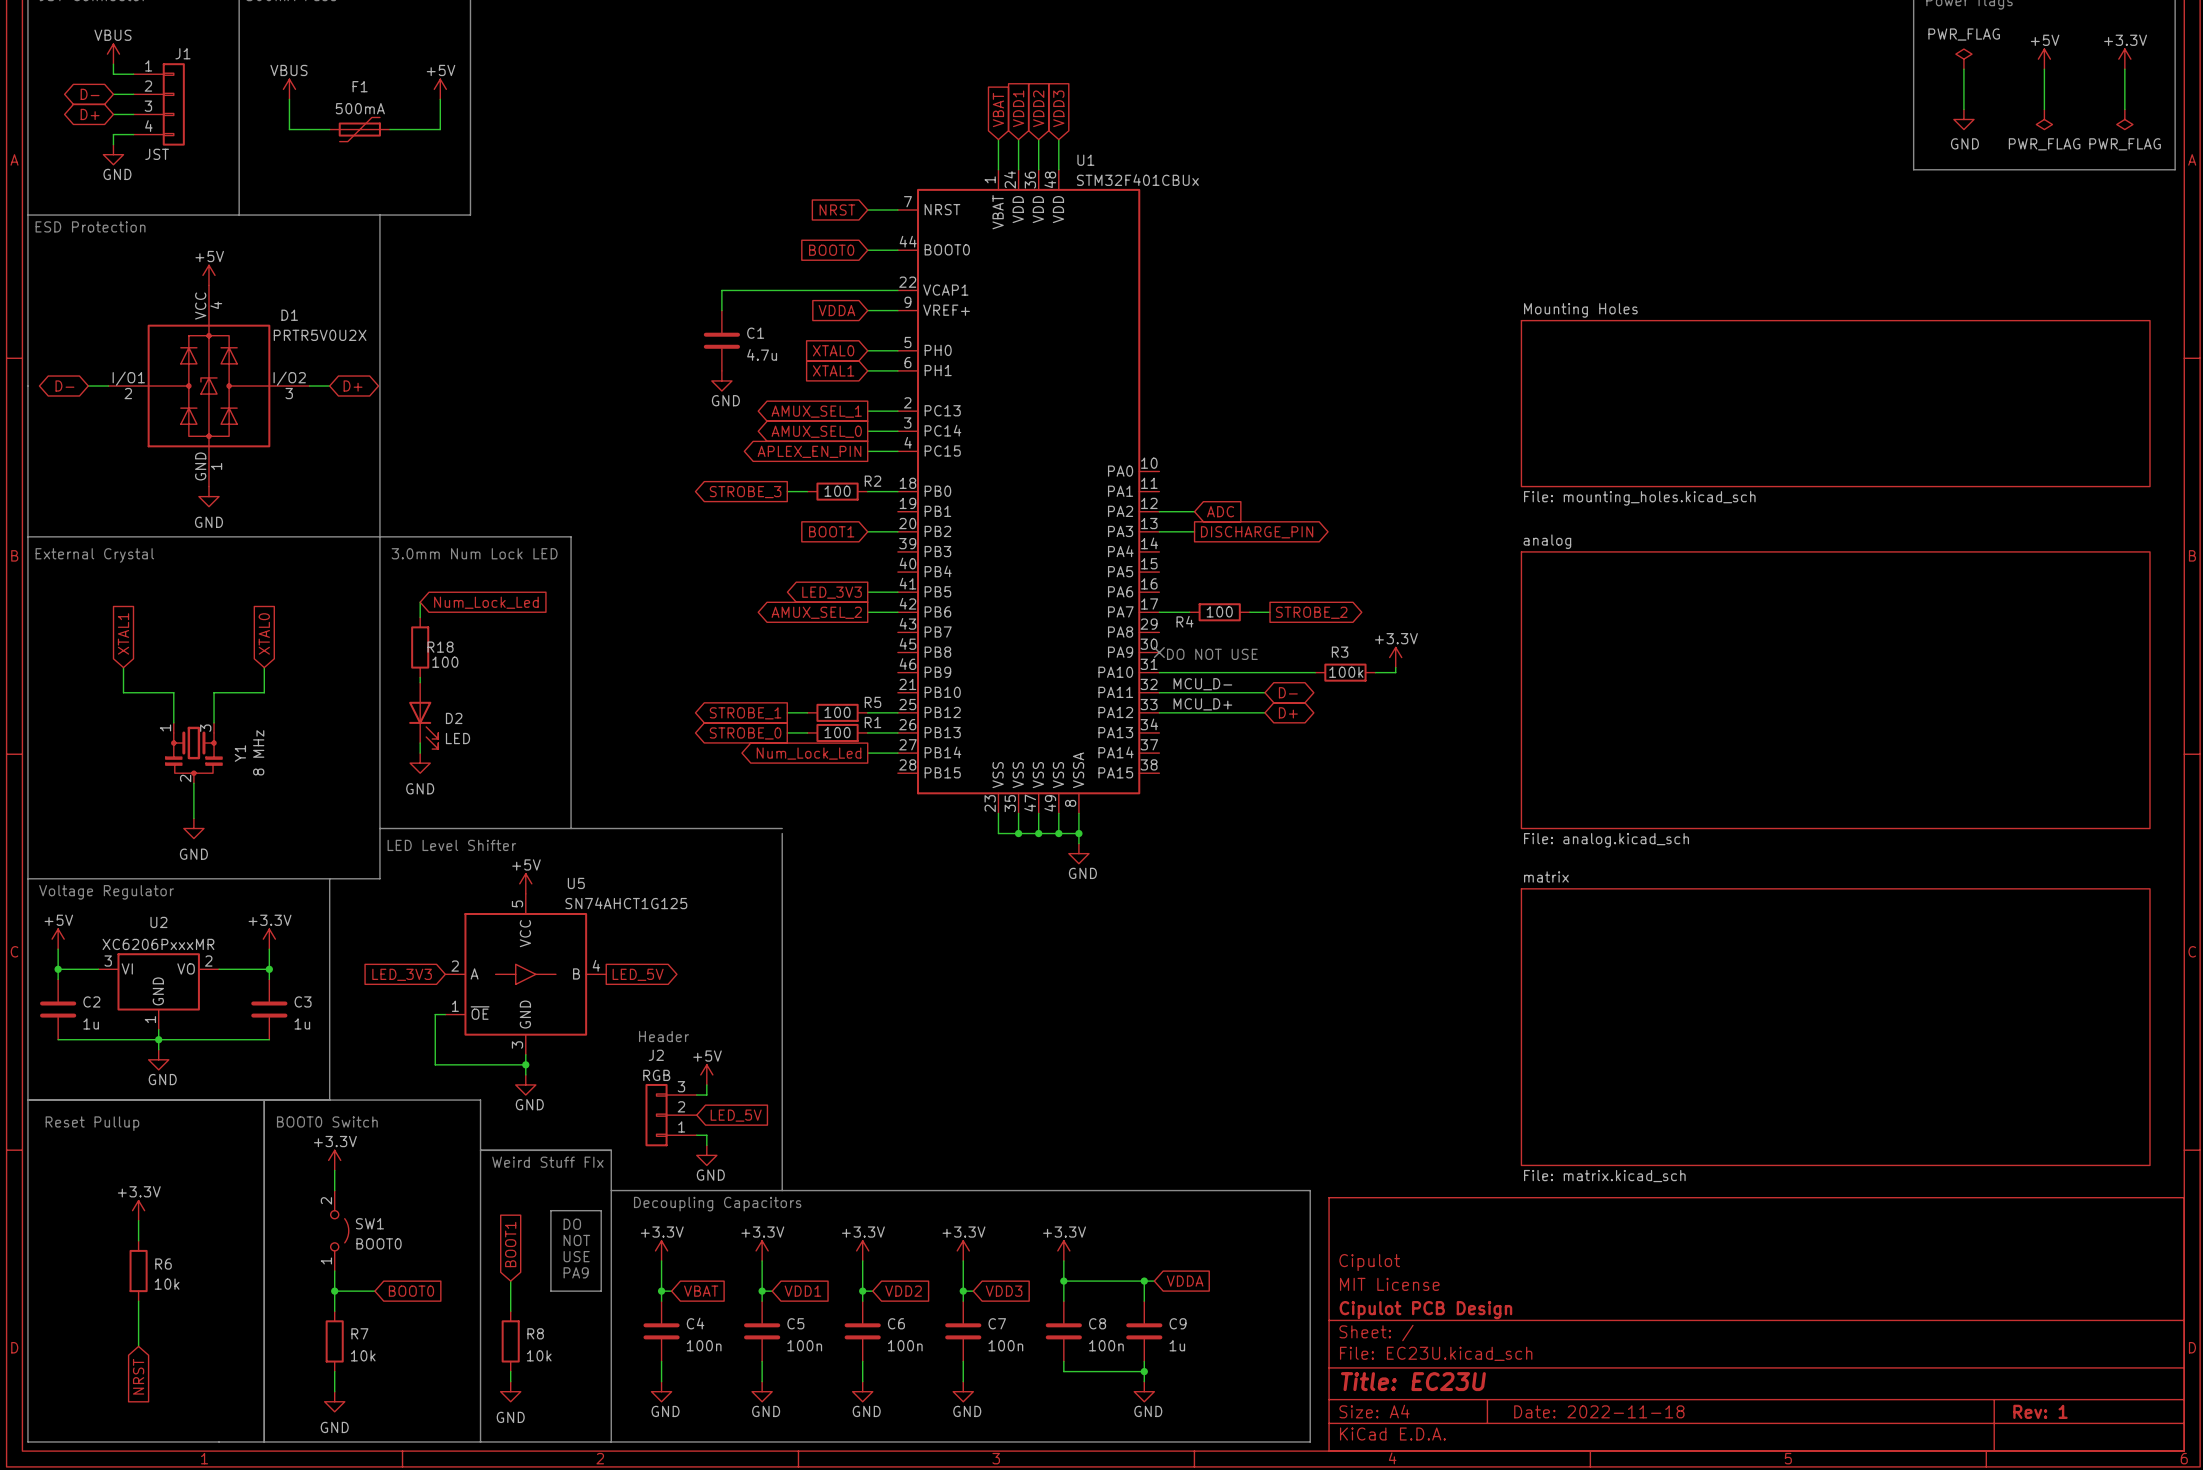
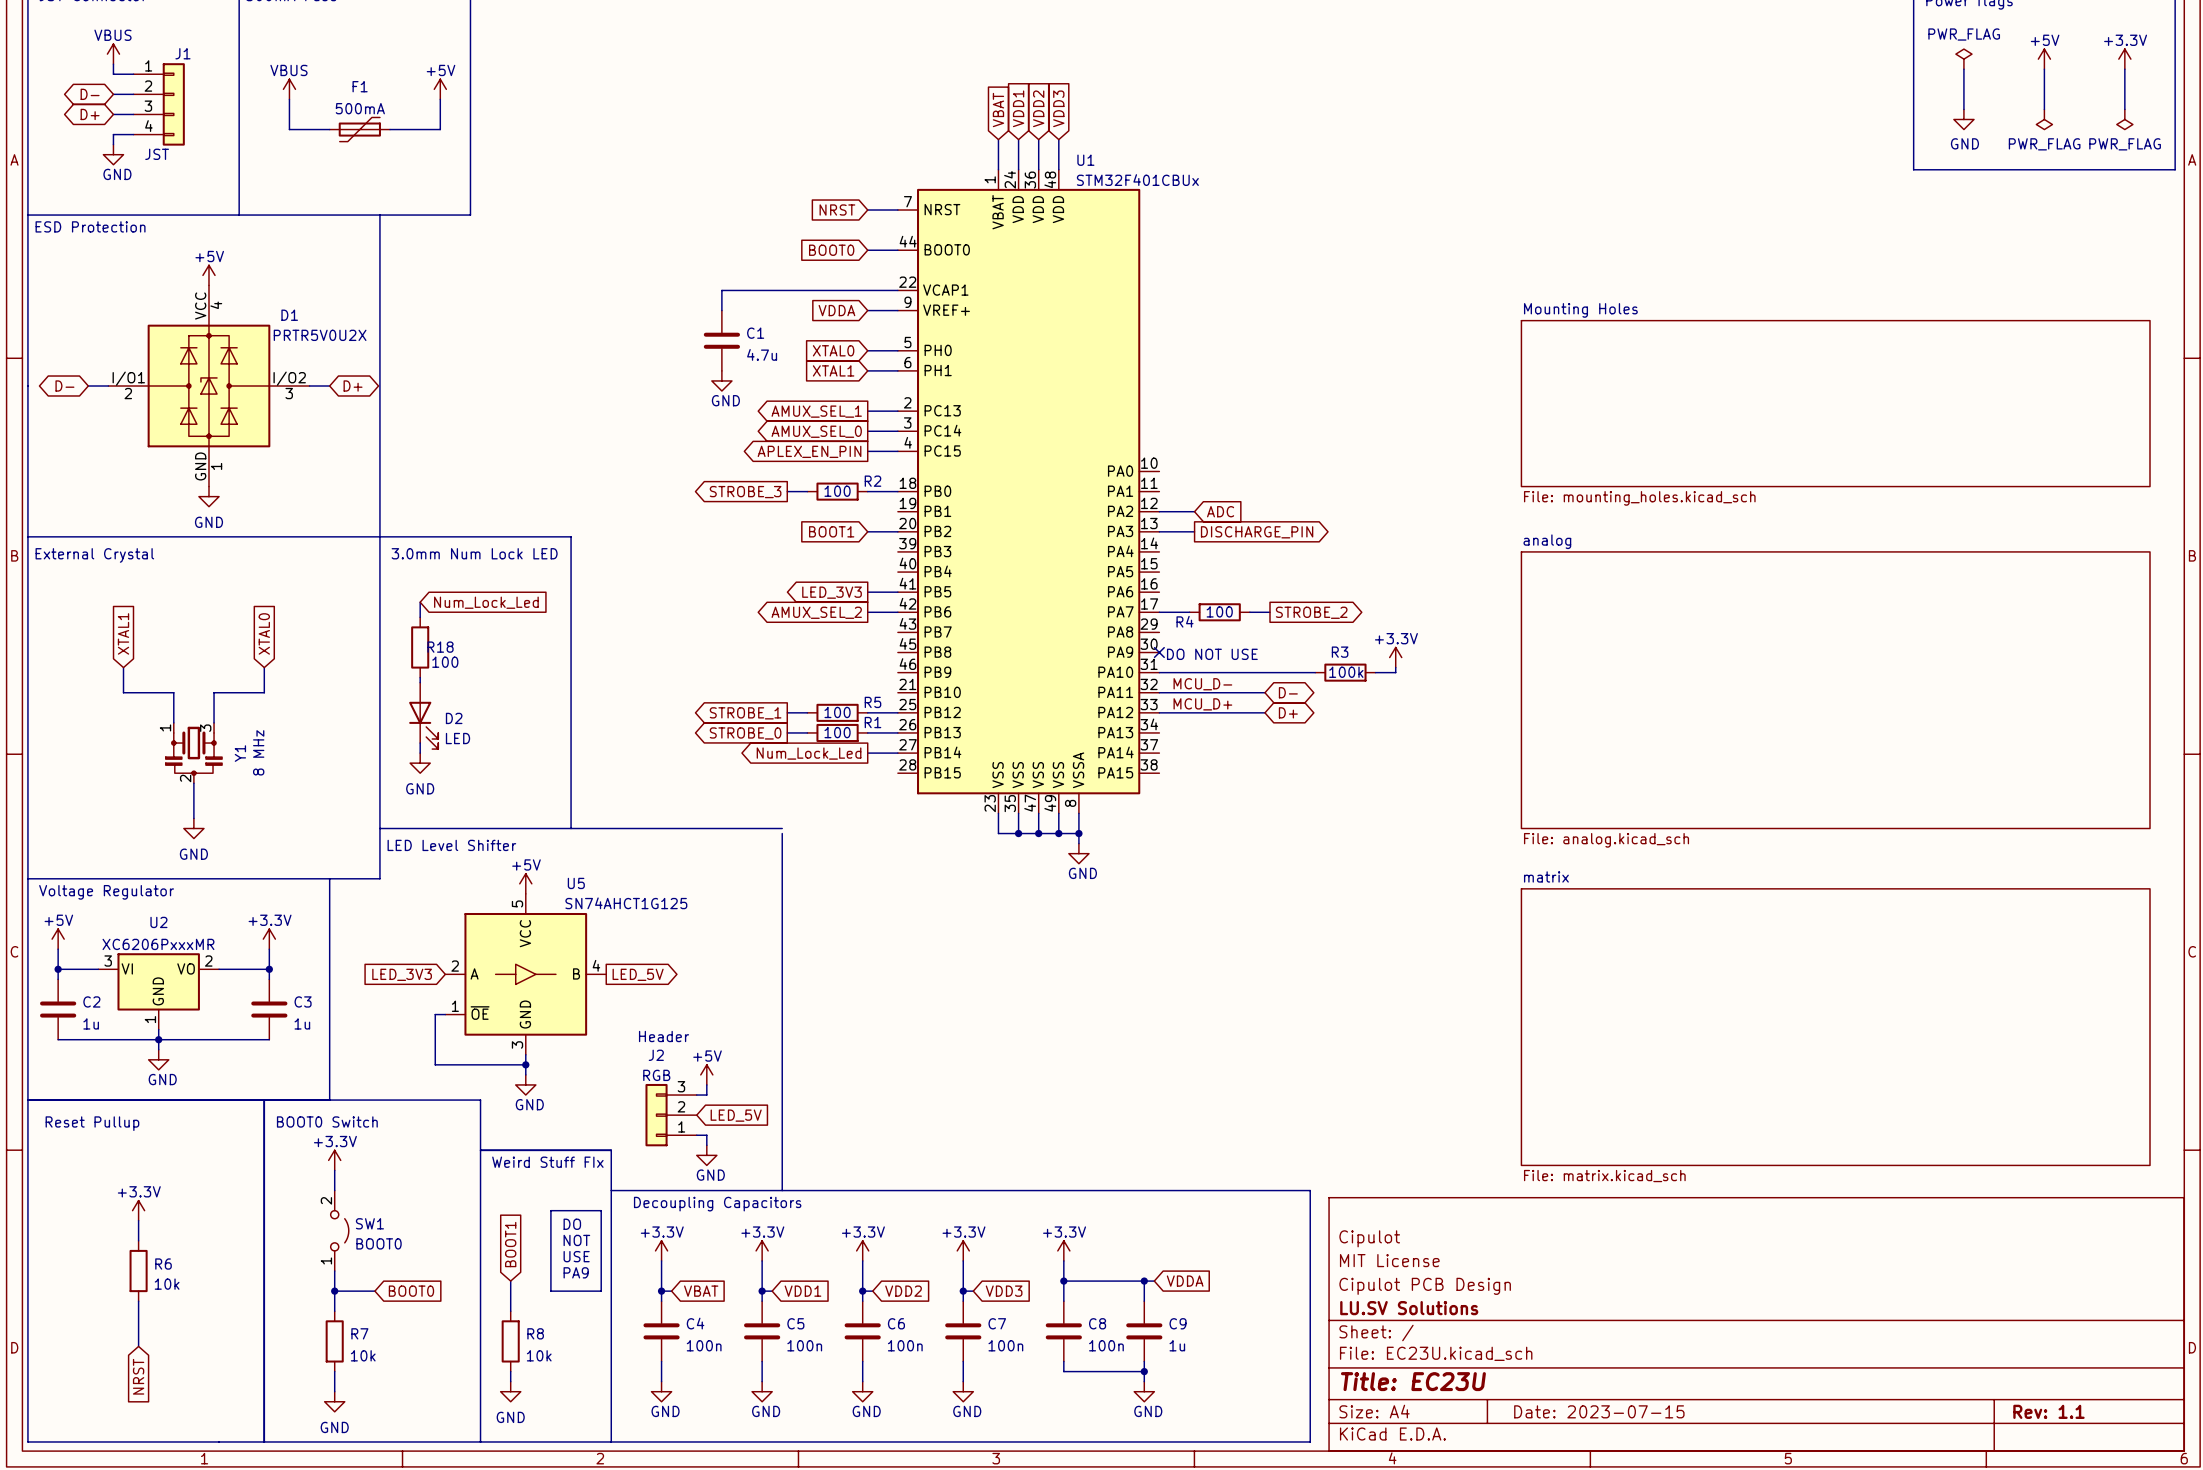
title block: none -> Cipulot (1369, 1238)
title block: Cipulot (1369, 1262) -> MIT License (1389, 1260)
title block: MIT License (1389, 1284) -> Cipulot PCB Design (1425, 1286)
title block: Cipulot PCB Design (1425, 1310) -> LU.SV Solutions (1409, 1308)
title block: Date: 2022-11-18 (1599, 1411) -> Date: 2023-07-15 (1599, 1411)
title block: Rev: 1 (2040, 1411) -> Rev: 1.1 (2048, 1411)

